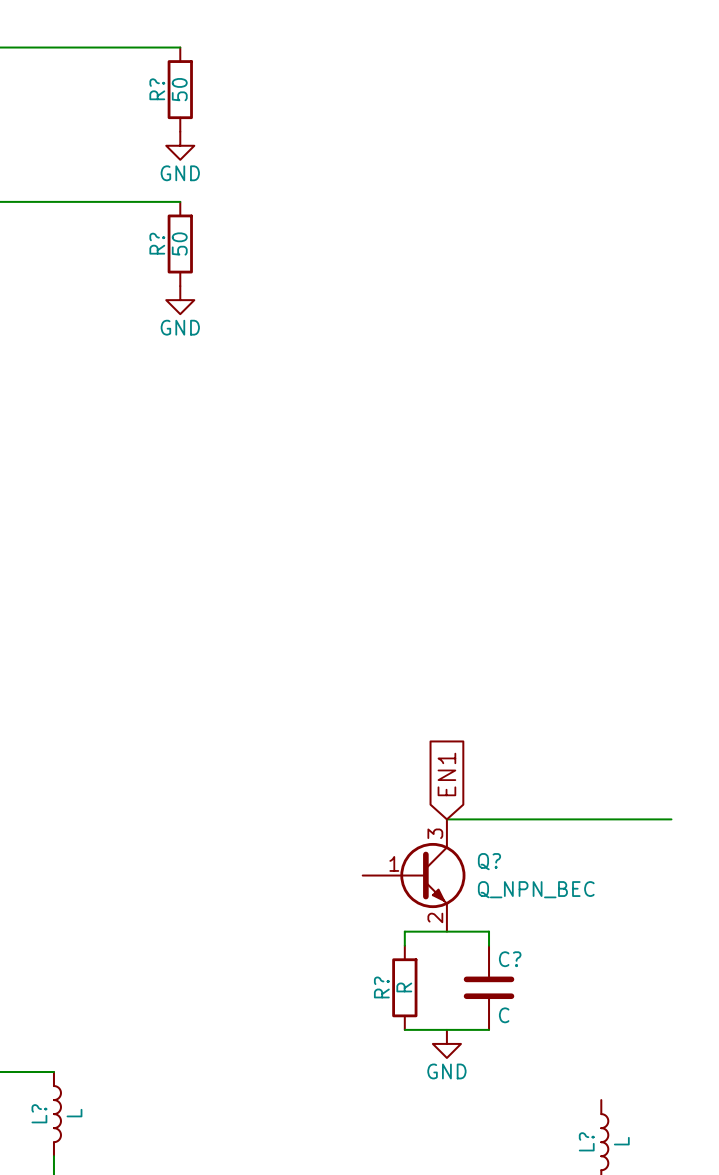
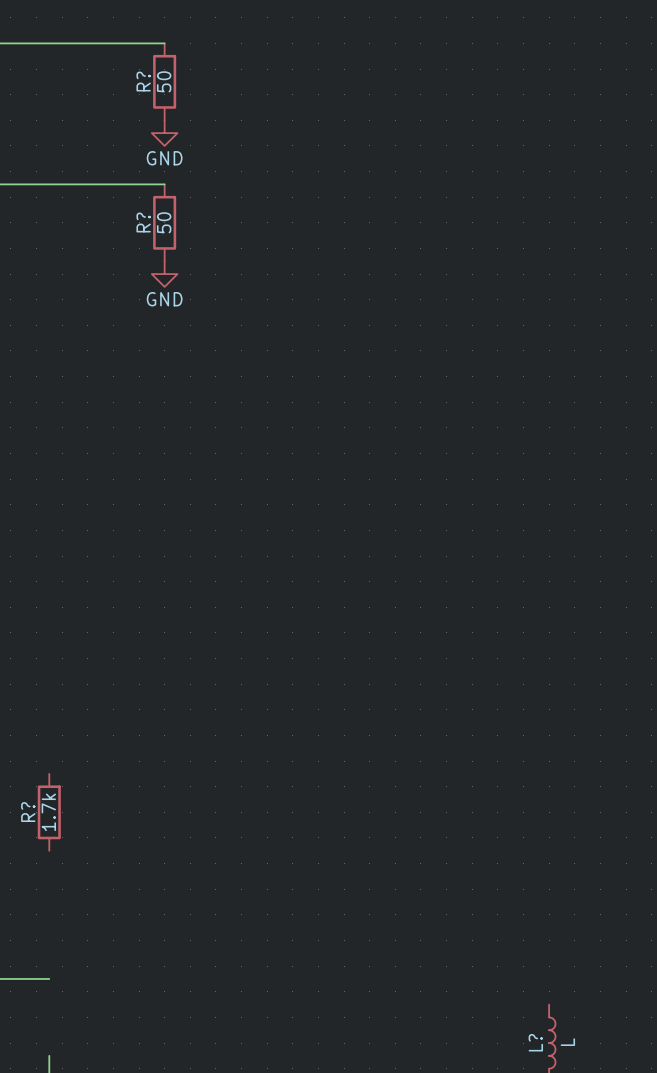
global label: EN1 (446, 774) -> none
wire: (446, 819) (671, 819) -> none
Q?: Q_NPN_BEC (414, 875) -> none
R?: none -> 1.7k (49, 812)
wire: (404, 945) (404, 931) (489, 931) (489, 945) -> none
R?: R (404, 987) -> none
C?: C (489, 987) -> none
wire: (404, 1029) (489, 1029) -> none
power symbol: GND (446, 1043) -> none
L?: L (57, 1114) -> none

